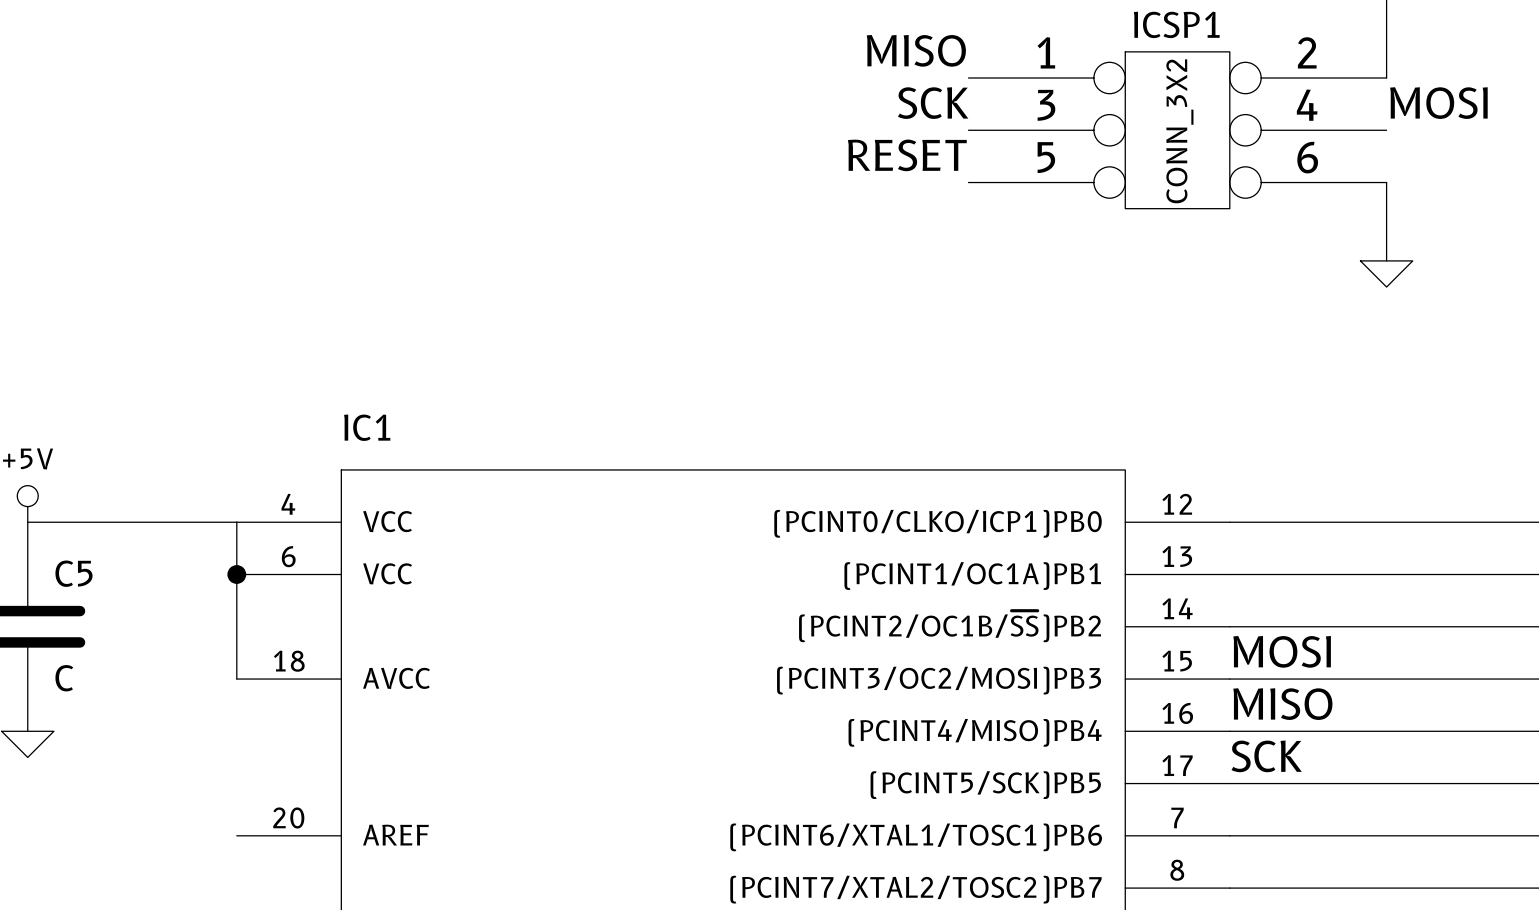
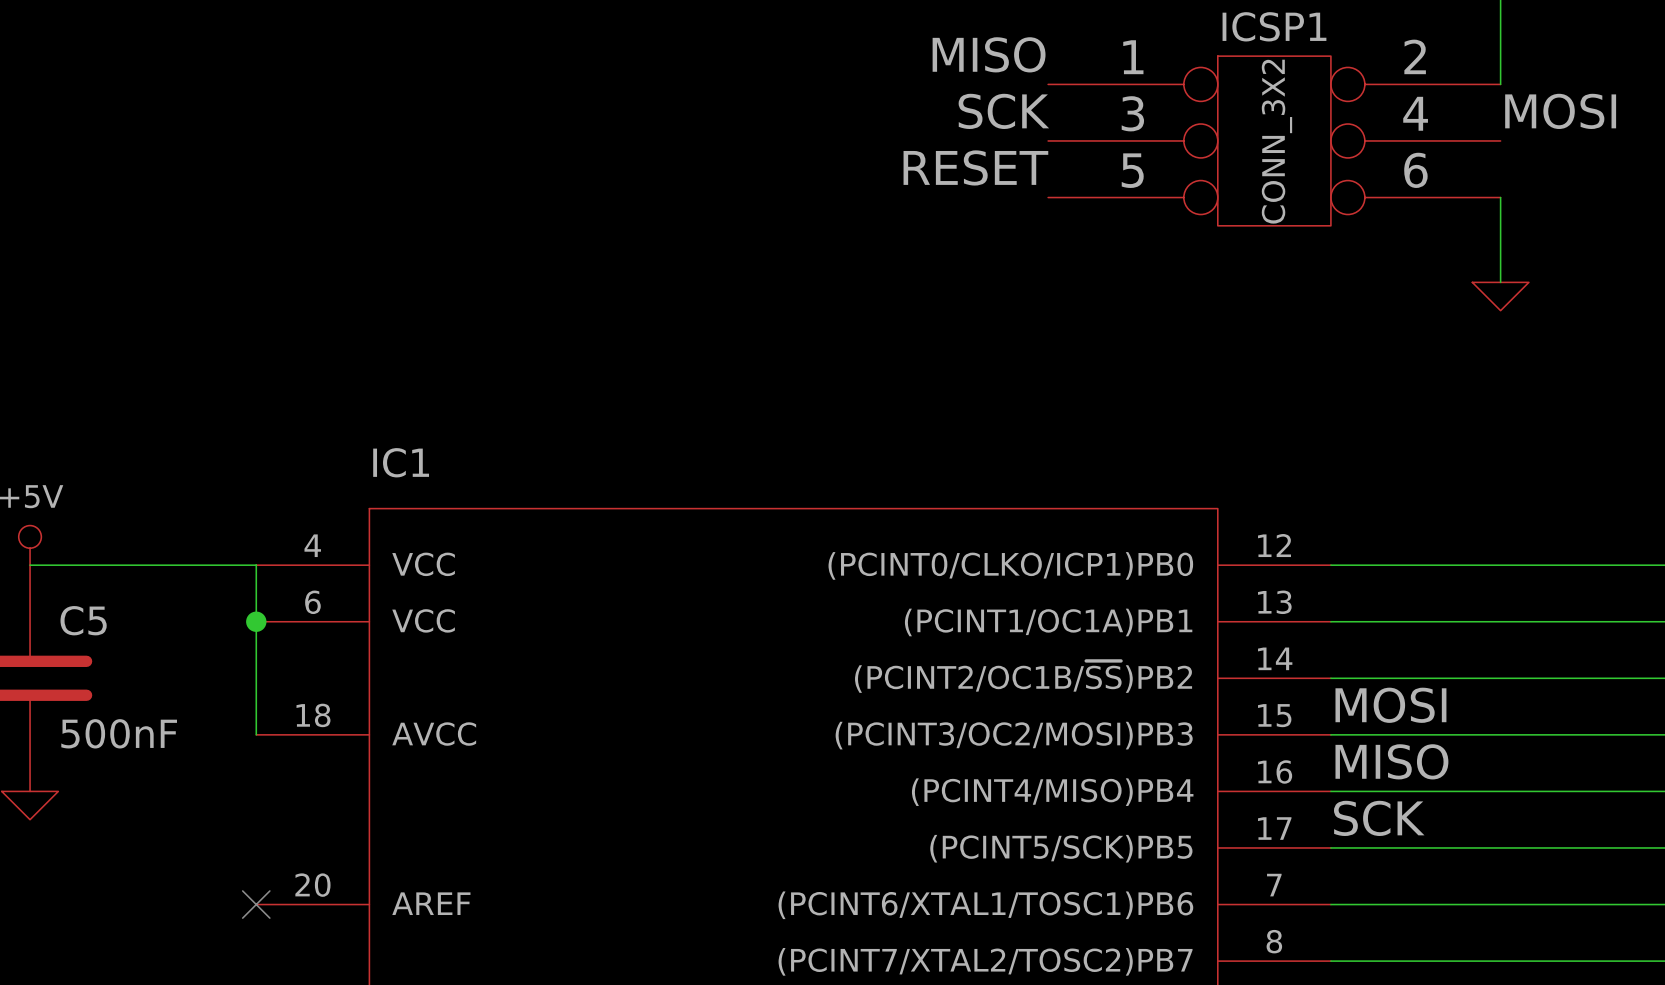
C5 value: C (64, 678) -> 500nF (119, 733)
no-connect mark: none -> (256, 904)

